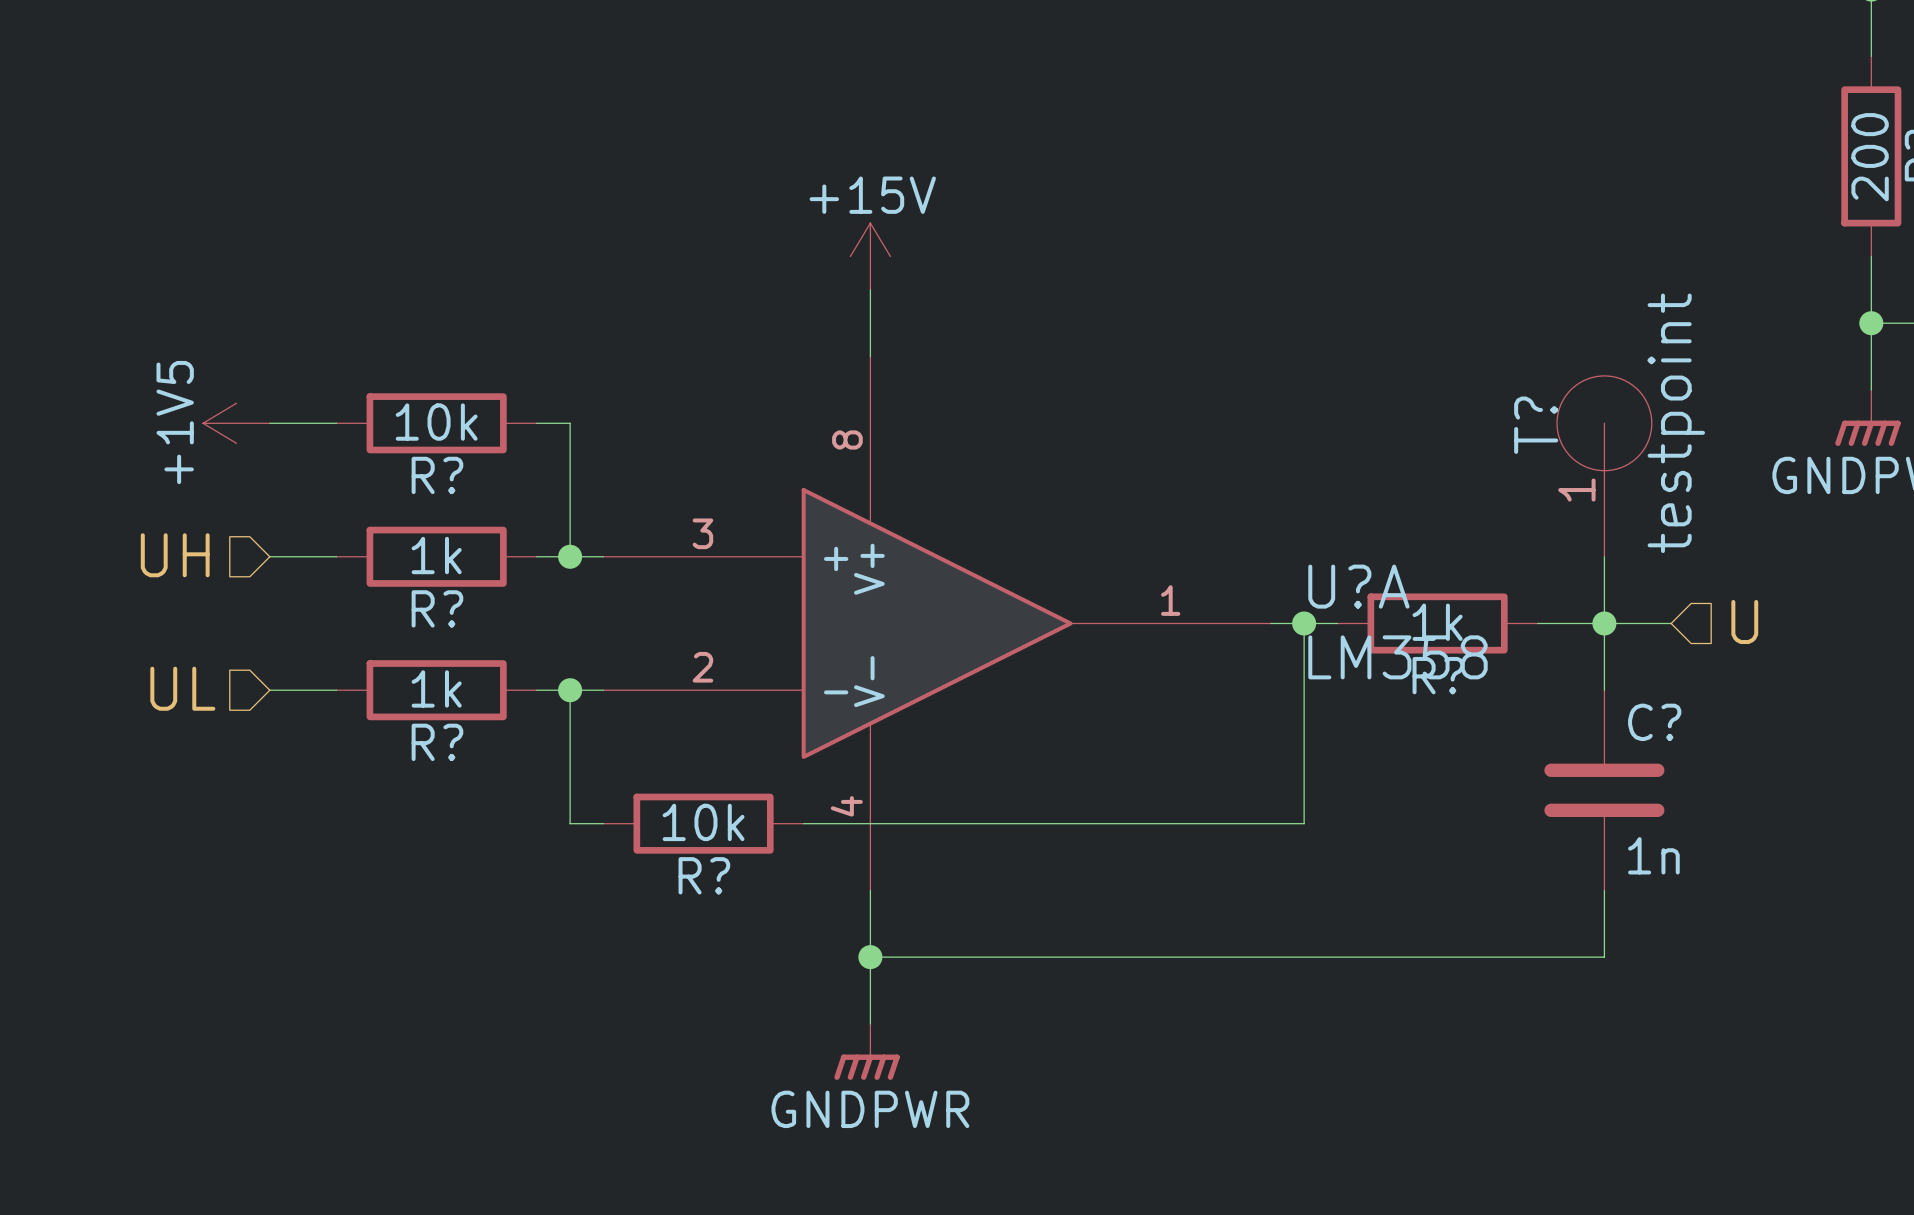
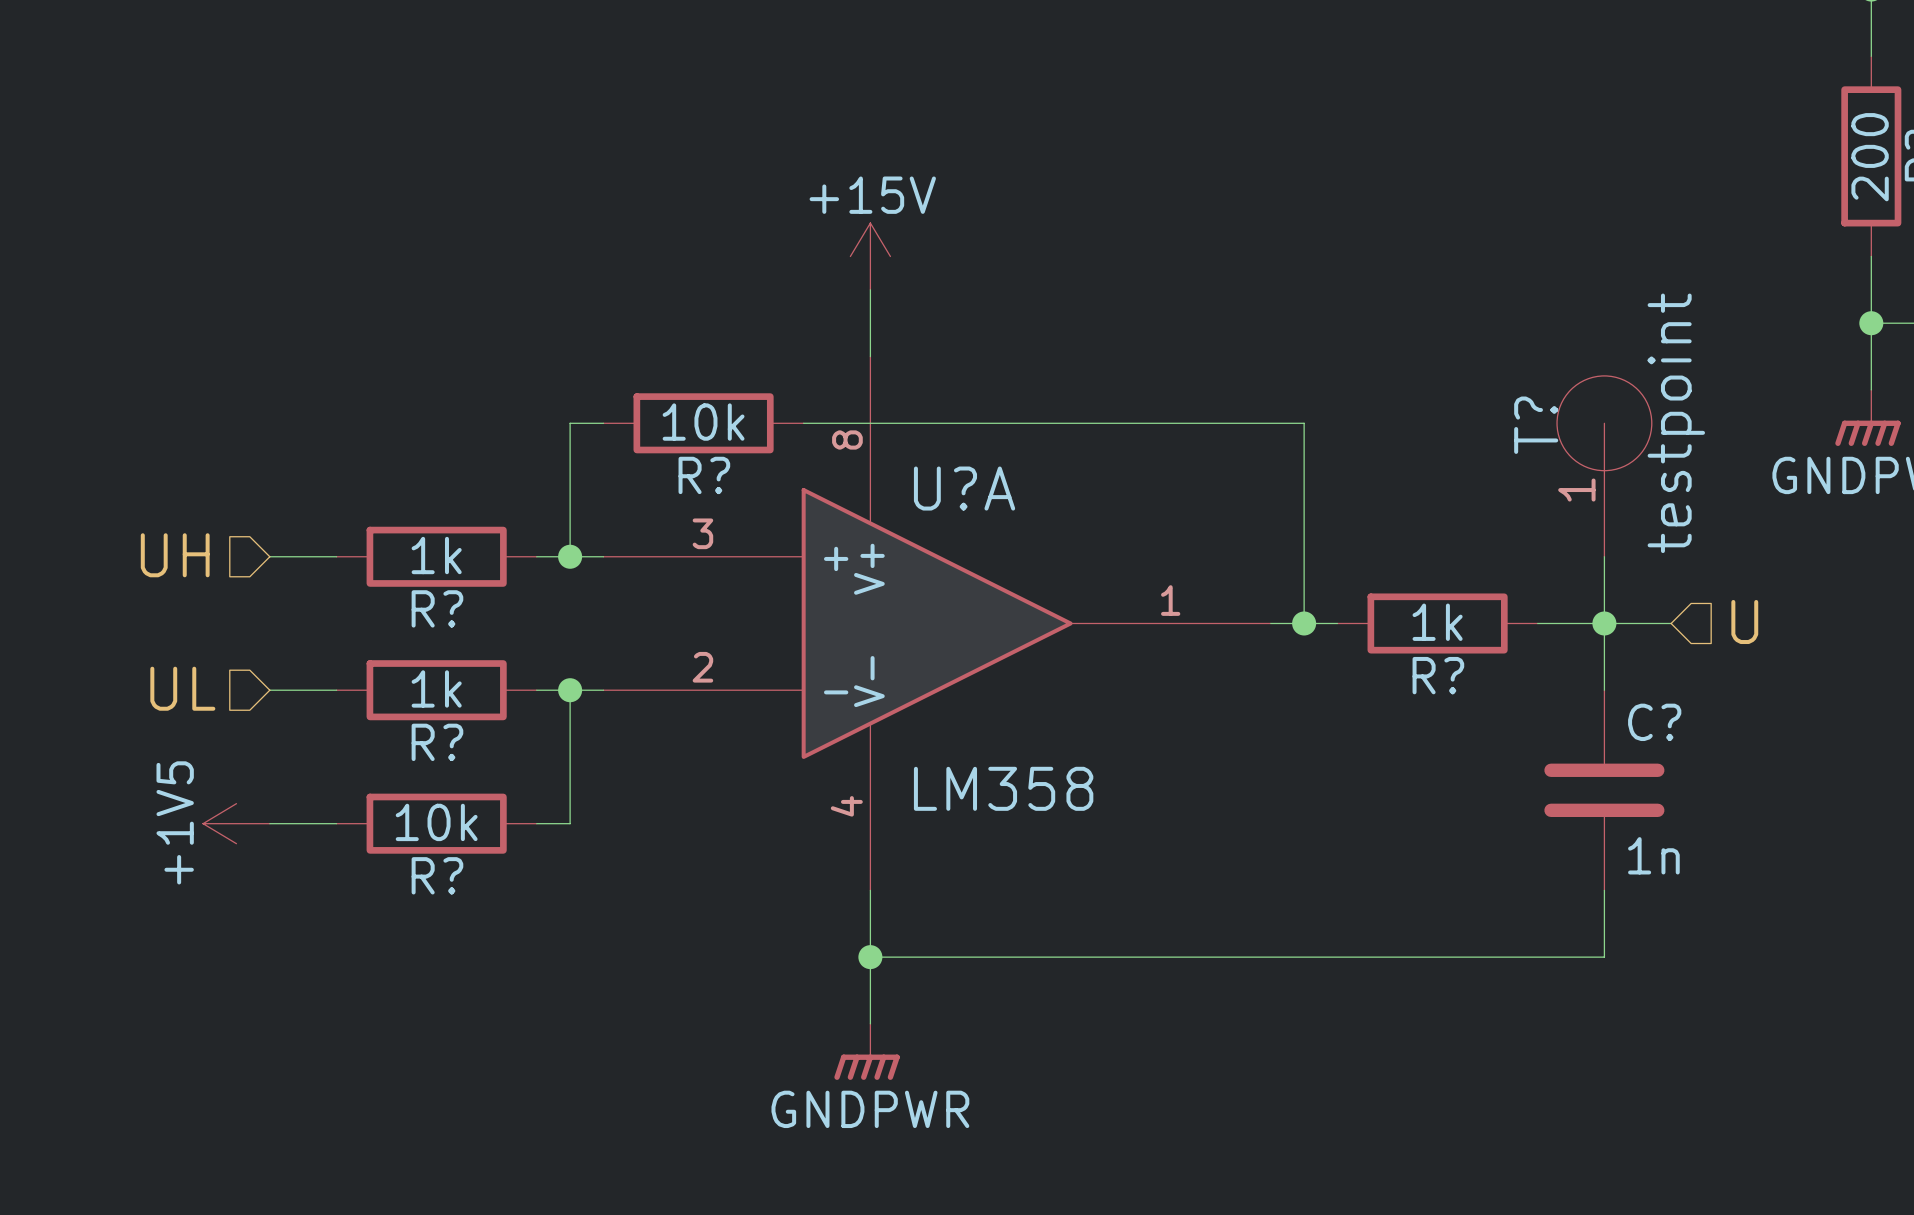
power symbol position: +1V5 (236, 423) -> +1V5 (236, 823)
wire: (269, 423) (336, 423) -> (269, 823) (336, 823)
R?: 10k (436, 423) -> none
wire: (536, 423) (570, 423) -> (603, 423) (570, 423)
R?: none -> 10k (703, 423)
U?A name position: U?A (1358, 586) -> U?A (964, 488)
wire: (1304, 623) (1304, 823) (803, 823) -> (1304, 623) (1304, 423) (803, 423)
U?A value position: LM358 (1397, 657) -> LM358 (1003, 788)
R?: none -> 10k (436, 823)
wire: (570, 823) (603, 823) -> (570, 823) (536, 823)
R?: 10k (703, 823) -> none

